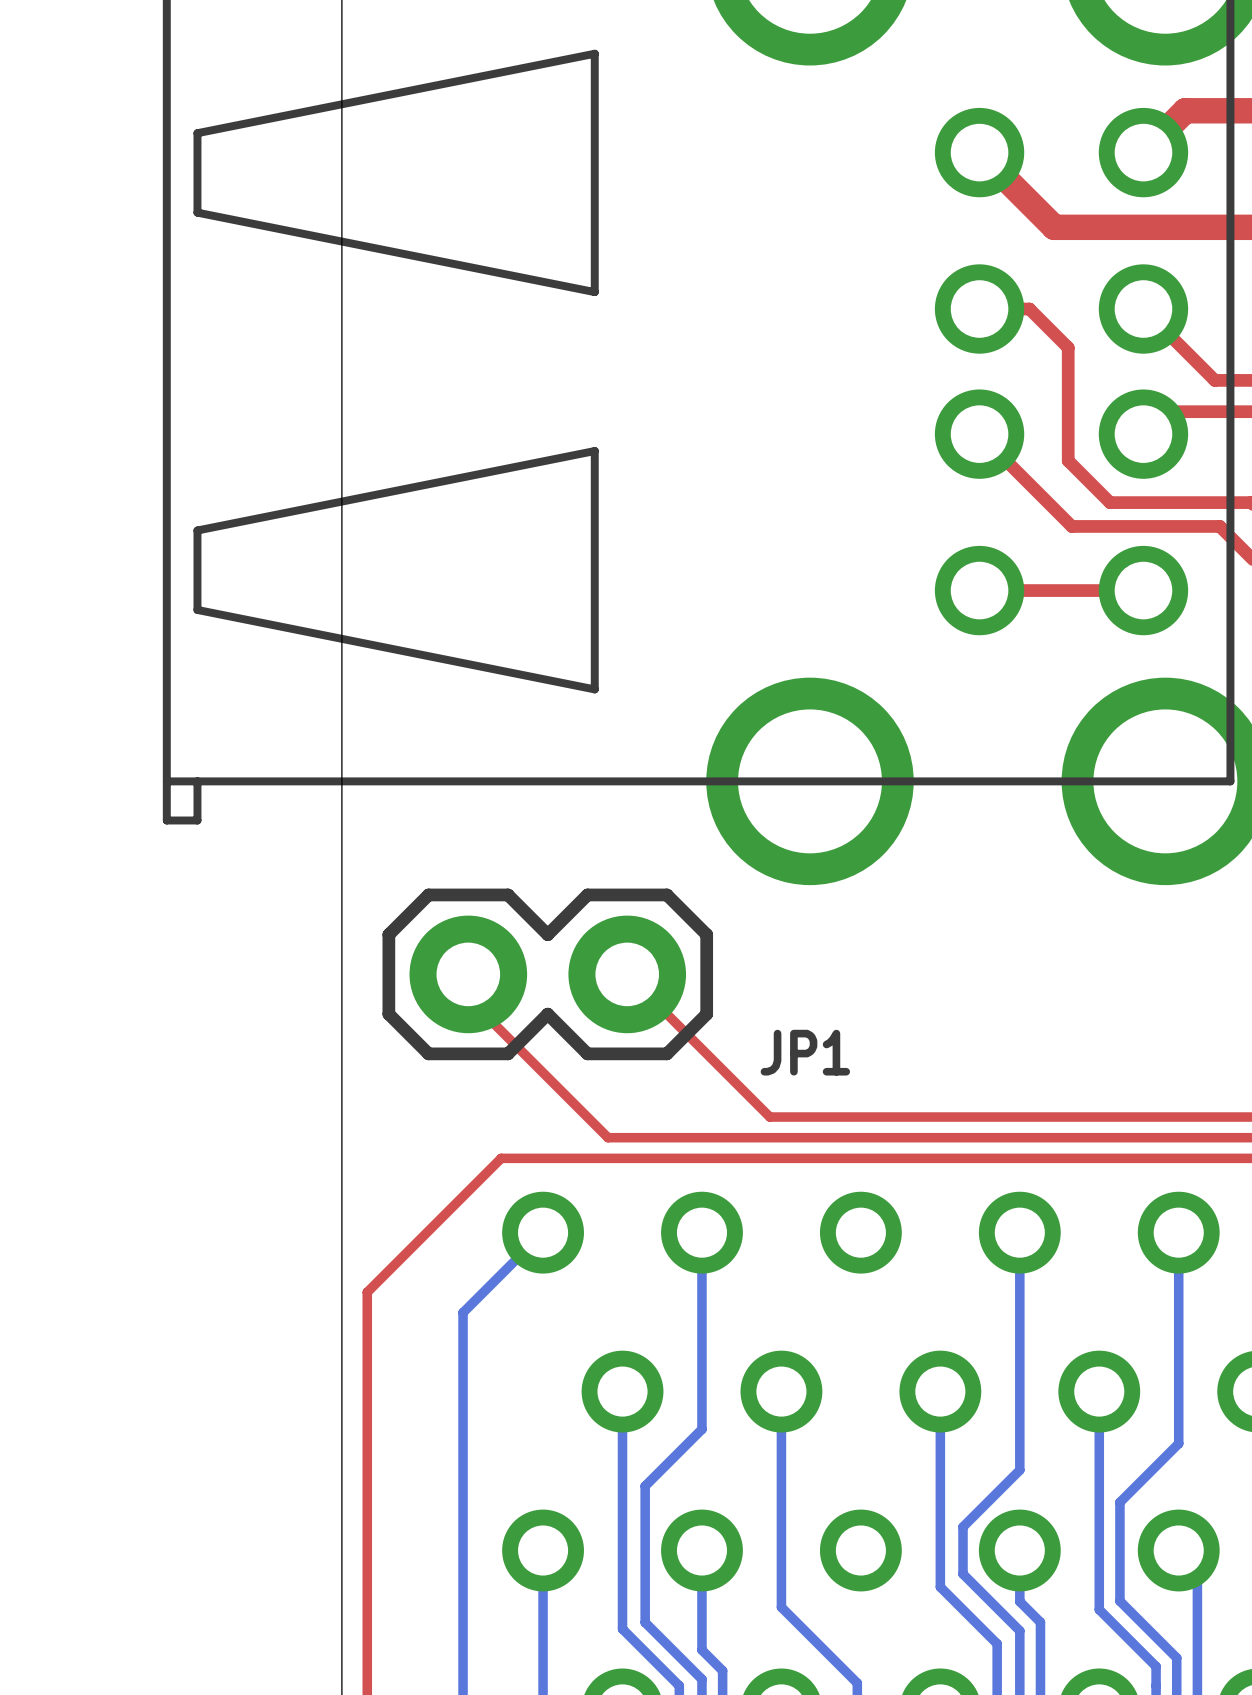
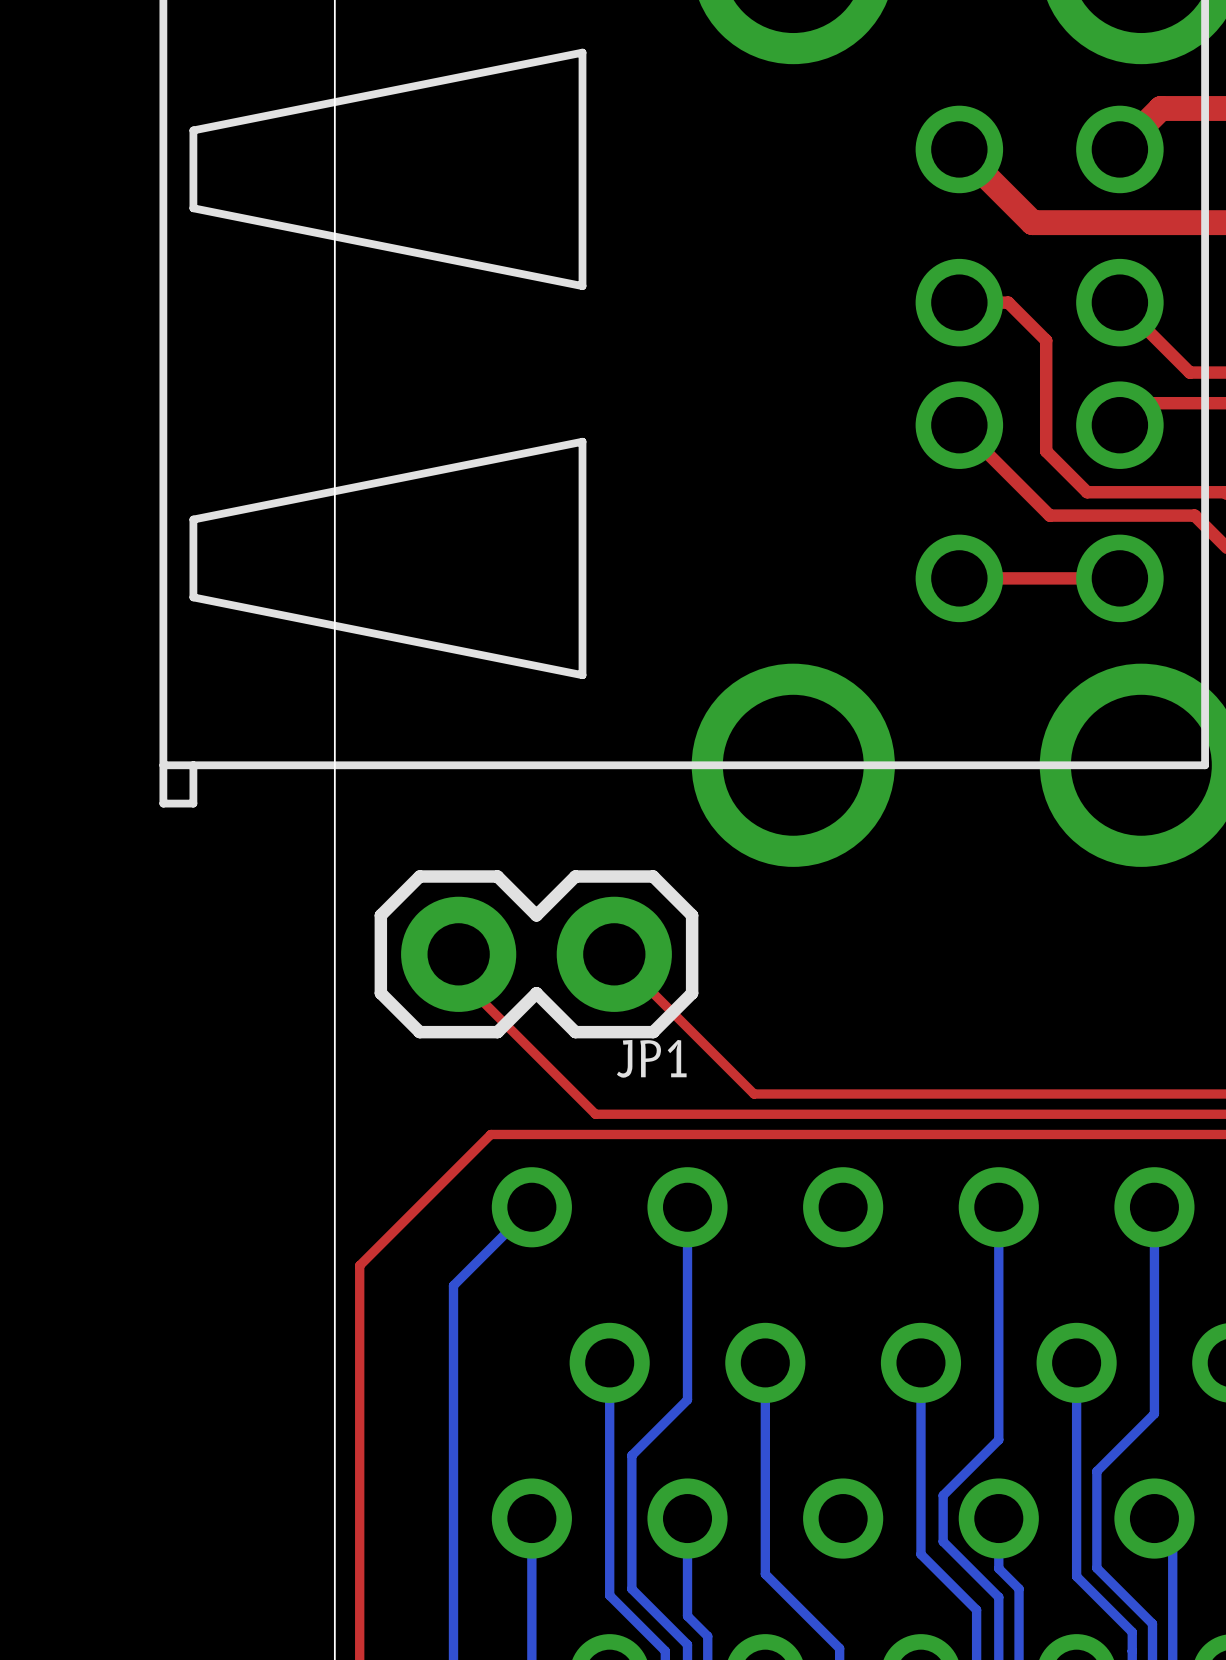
JP1 name position: JP1 (805, 1052) -> JP1 (651, 1058)

